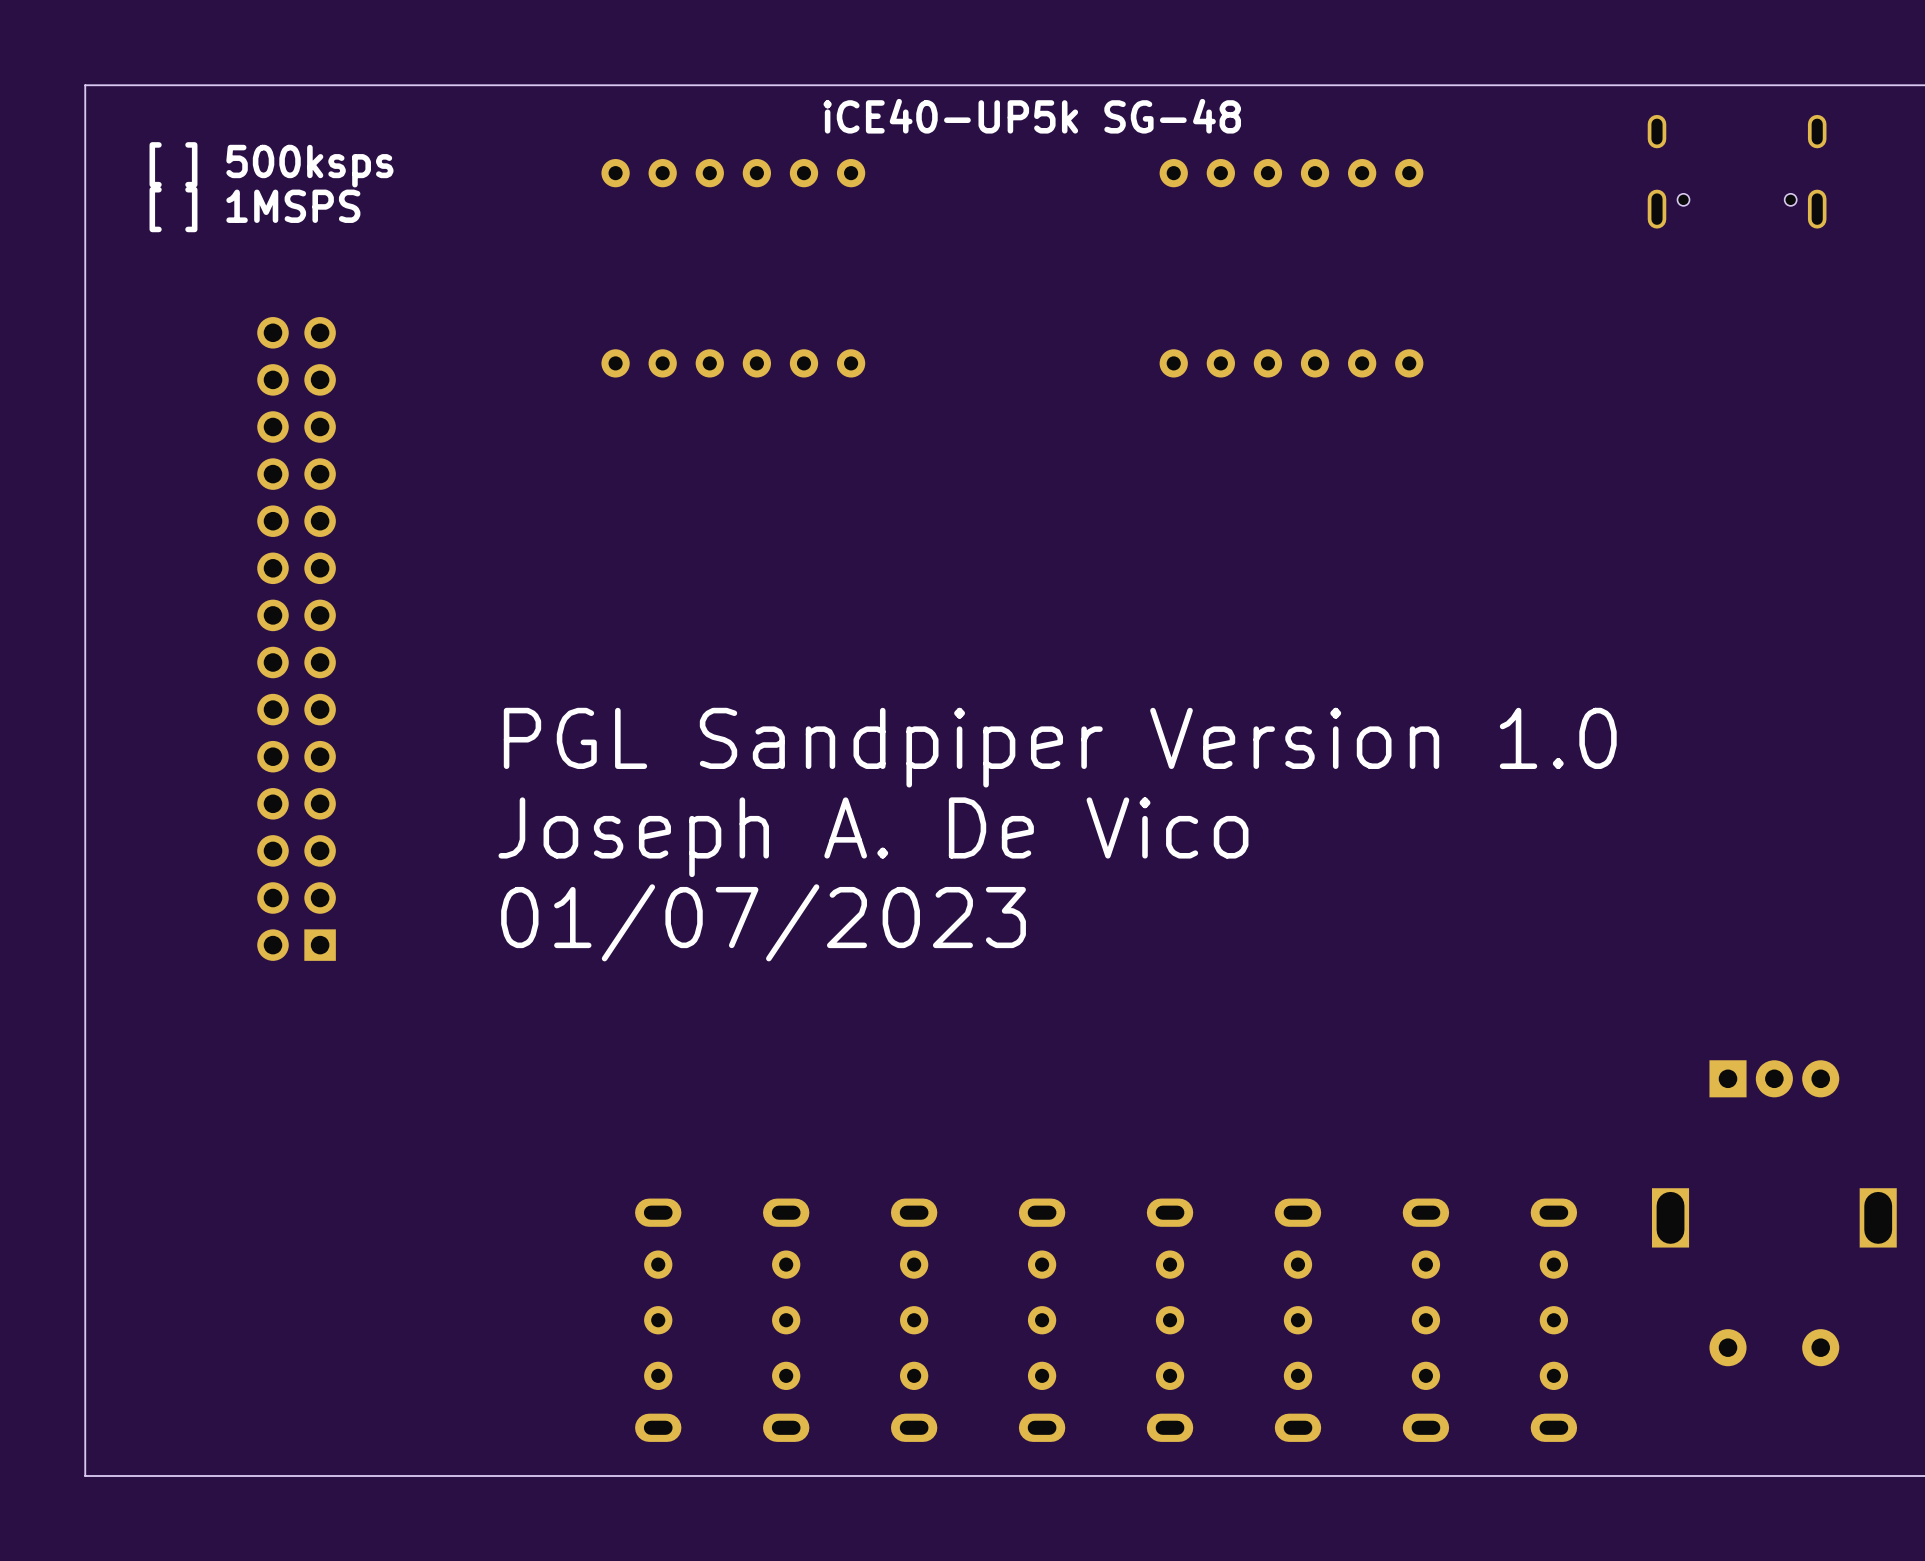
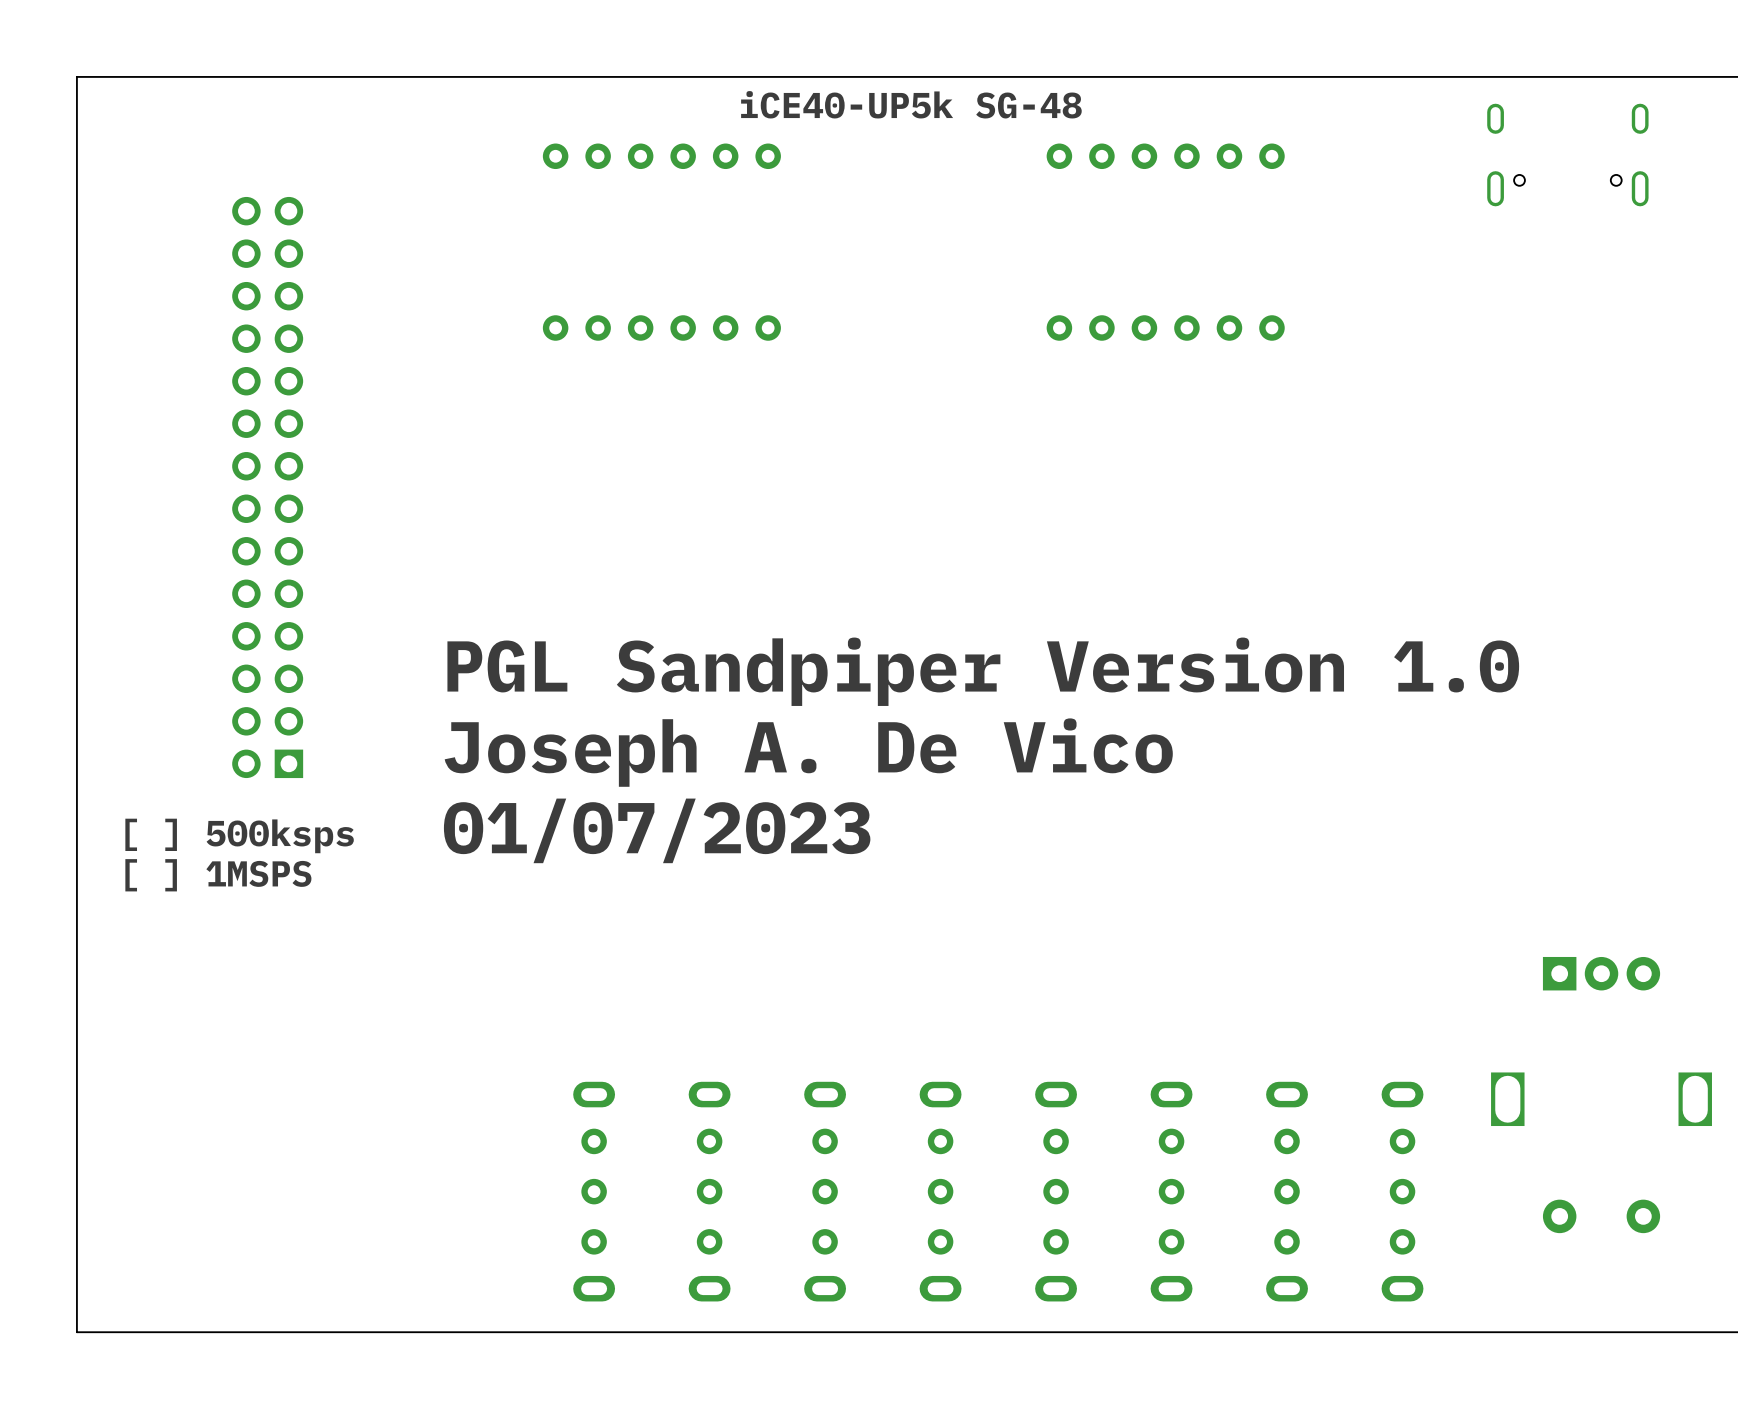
text: [ ] 500ksps (271, 164) -> none
text: [ ] 1MSPS (254, 209) -> none
part position: (296, 638) -> (267, 487)
text: none -> [ ] 500ksps (239, 835)
text: none -> [ ] 1MSPS (218, 875)

